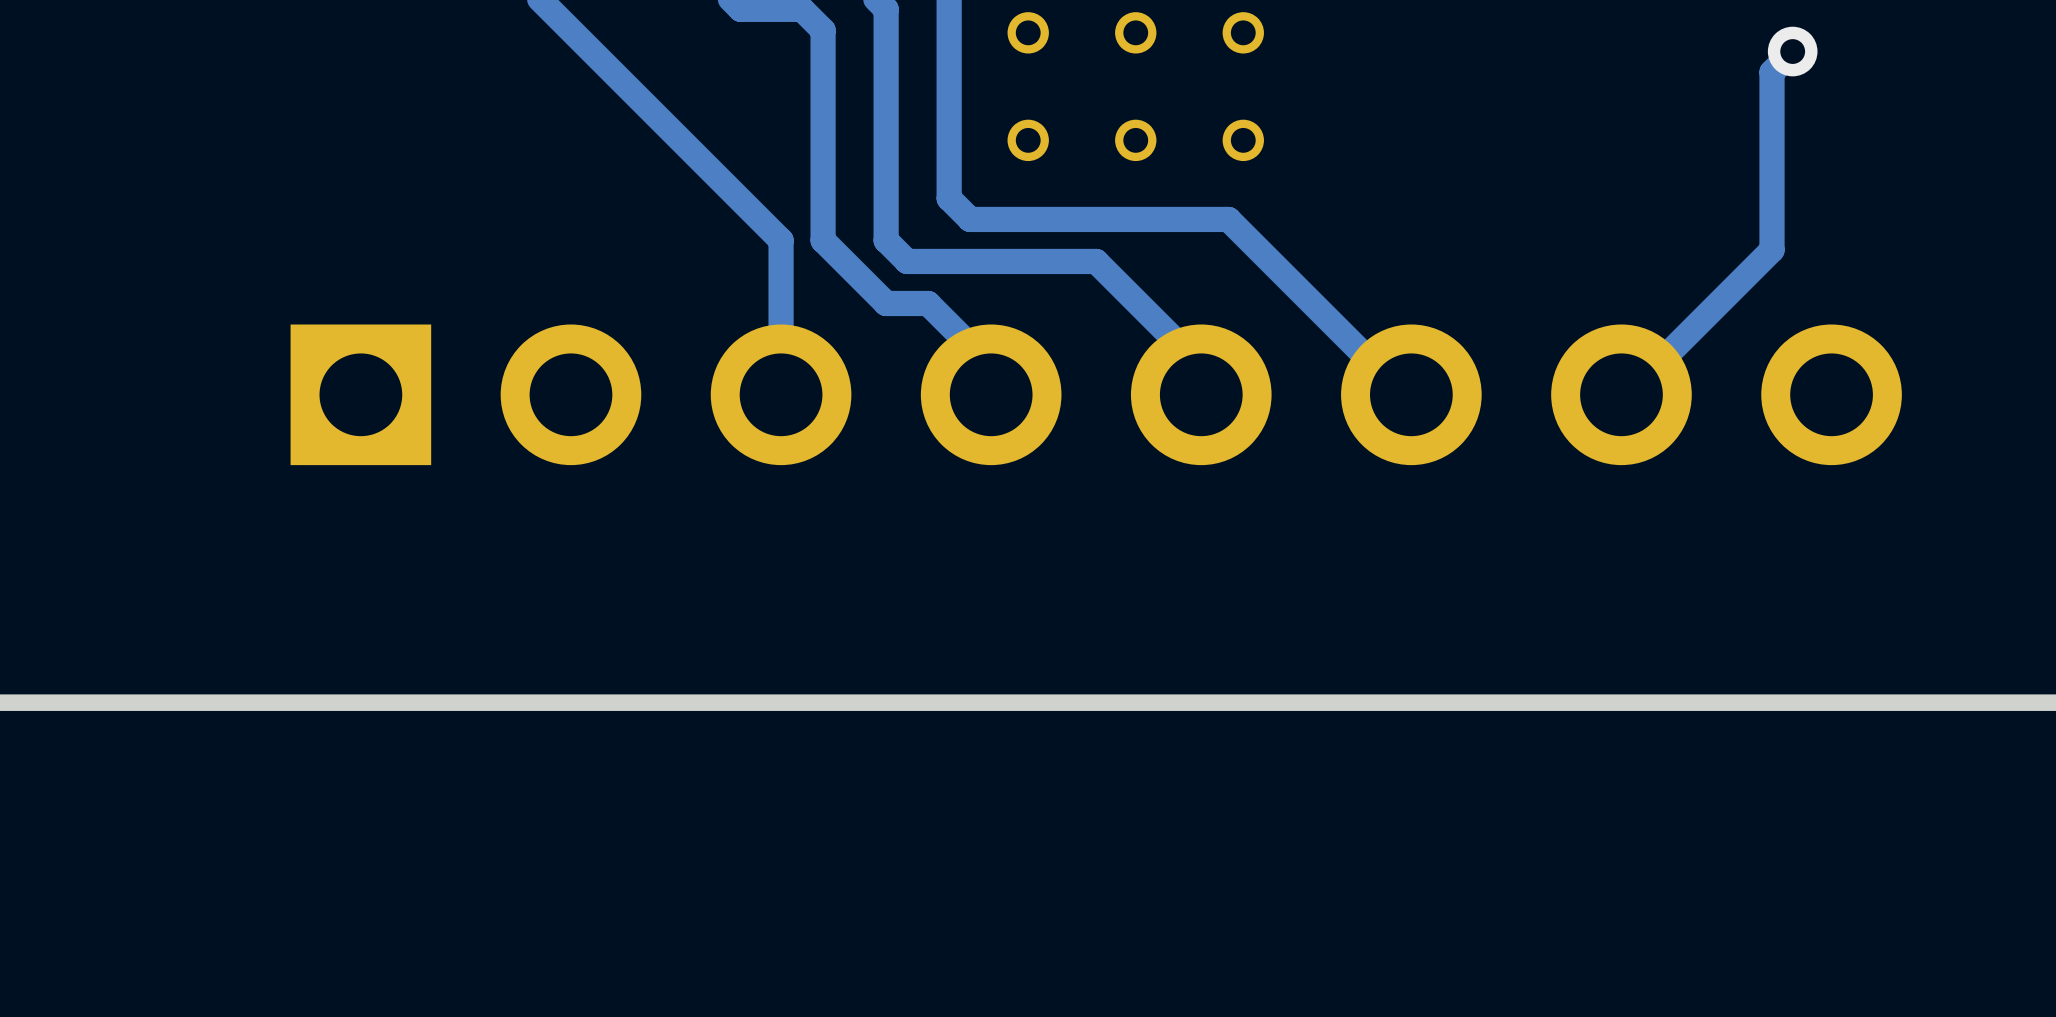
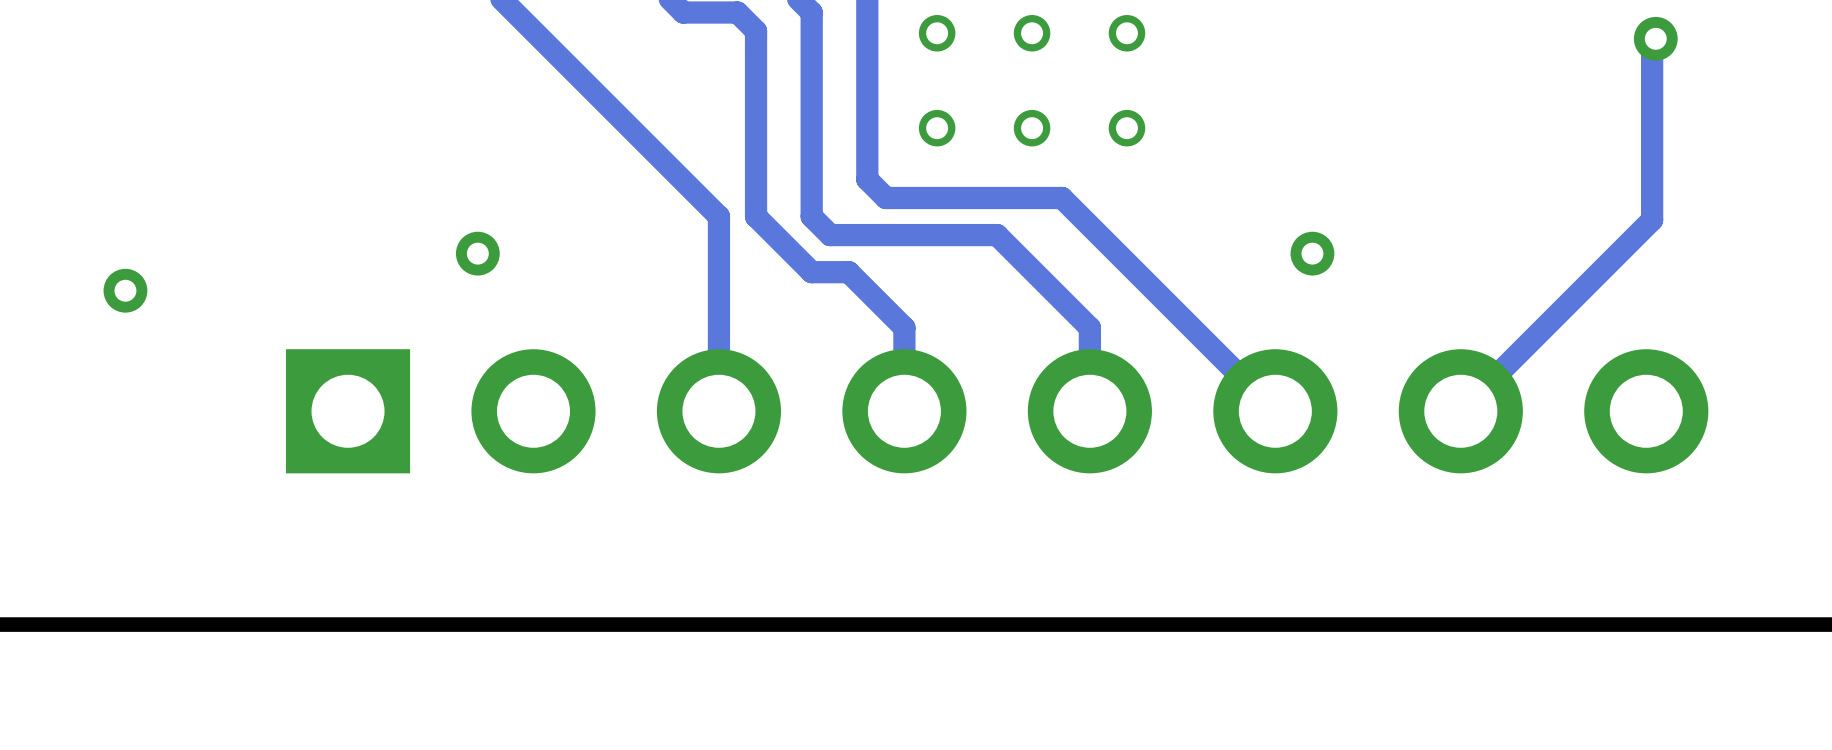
track: none -> (1655, 38) (1652, 42) (1652, 219) (1460, 411)
track: (1792, 51) (1772, 72) (1772, 250) (1622, 399) (1622, 403) -> none
via position: (1792, 51) -> (1655, 38)
track: (1169, 219) (1228, 219) (1412, 403) -> (1062, 197) (1275, 411)
via: none -> (477, 253)
via: none -> (1312, 253)
via: none -> (125, 290)
part position: (1096, 394) -> (997, 411)

